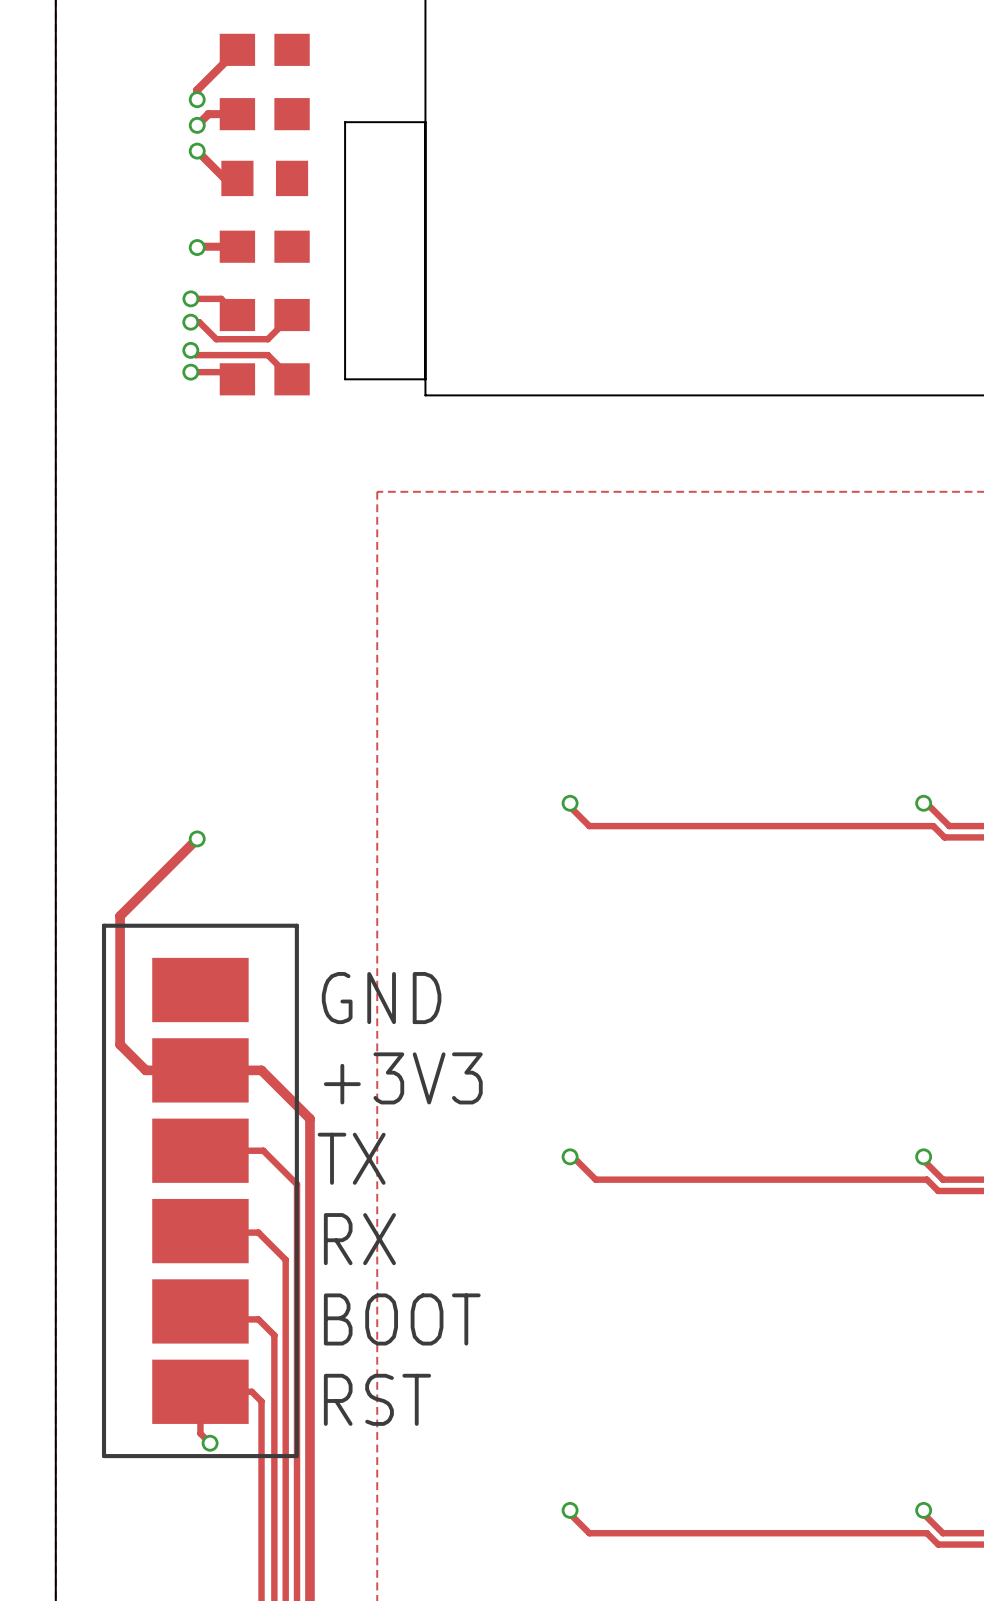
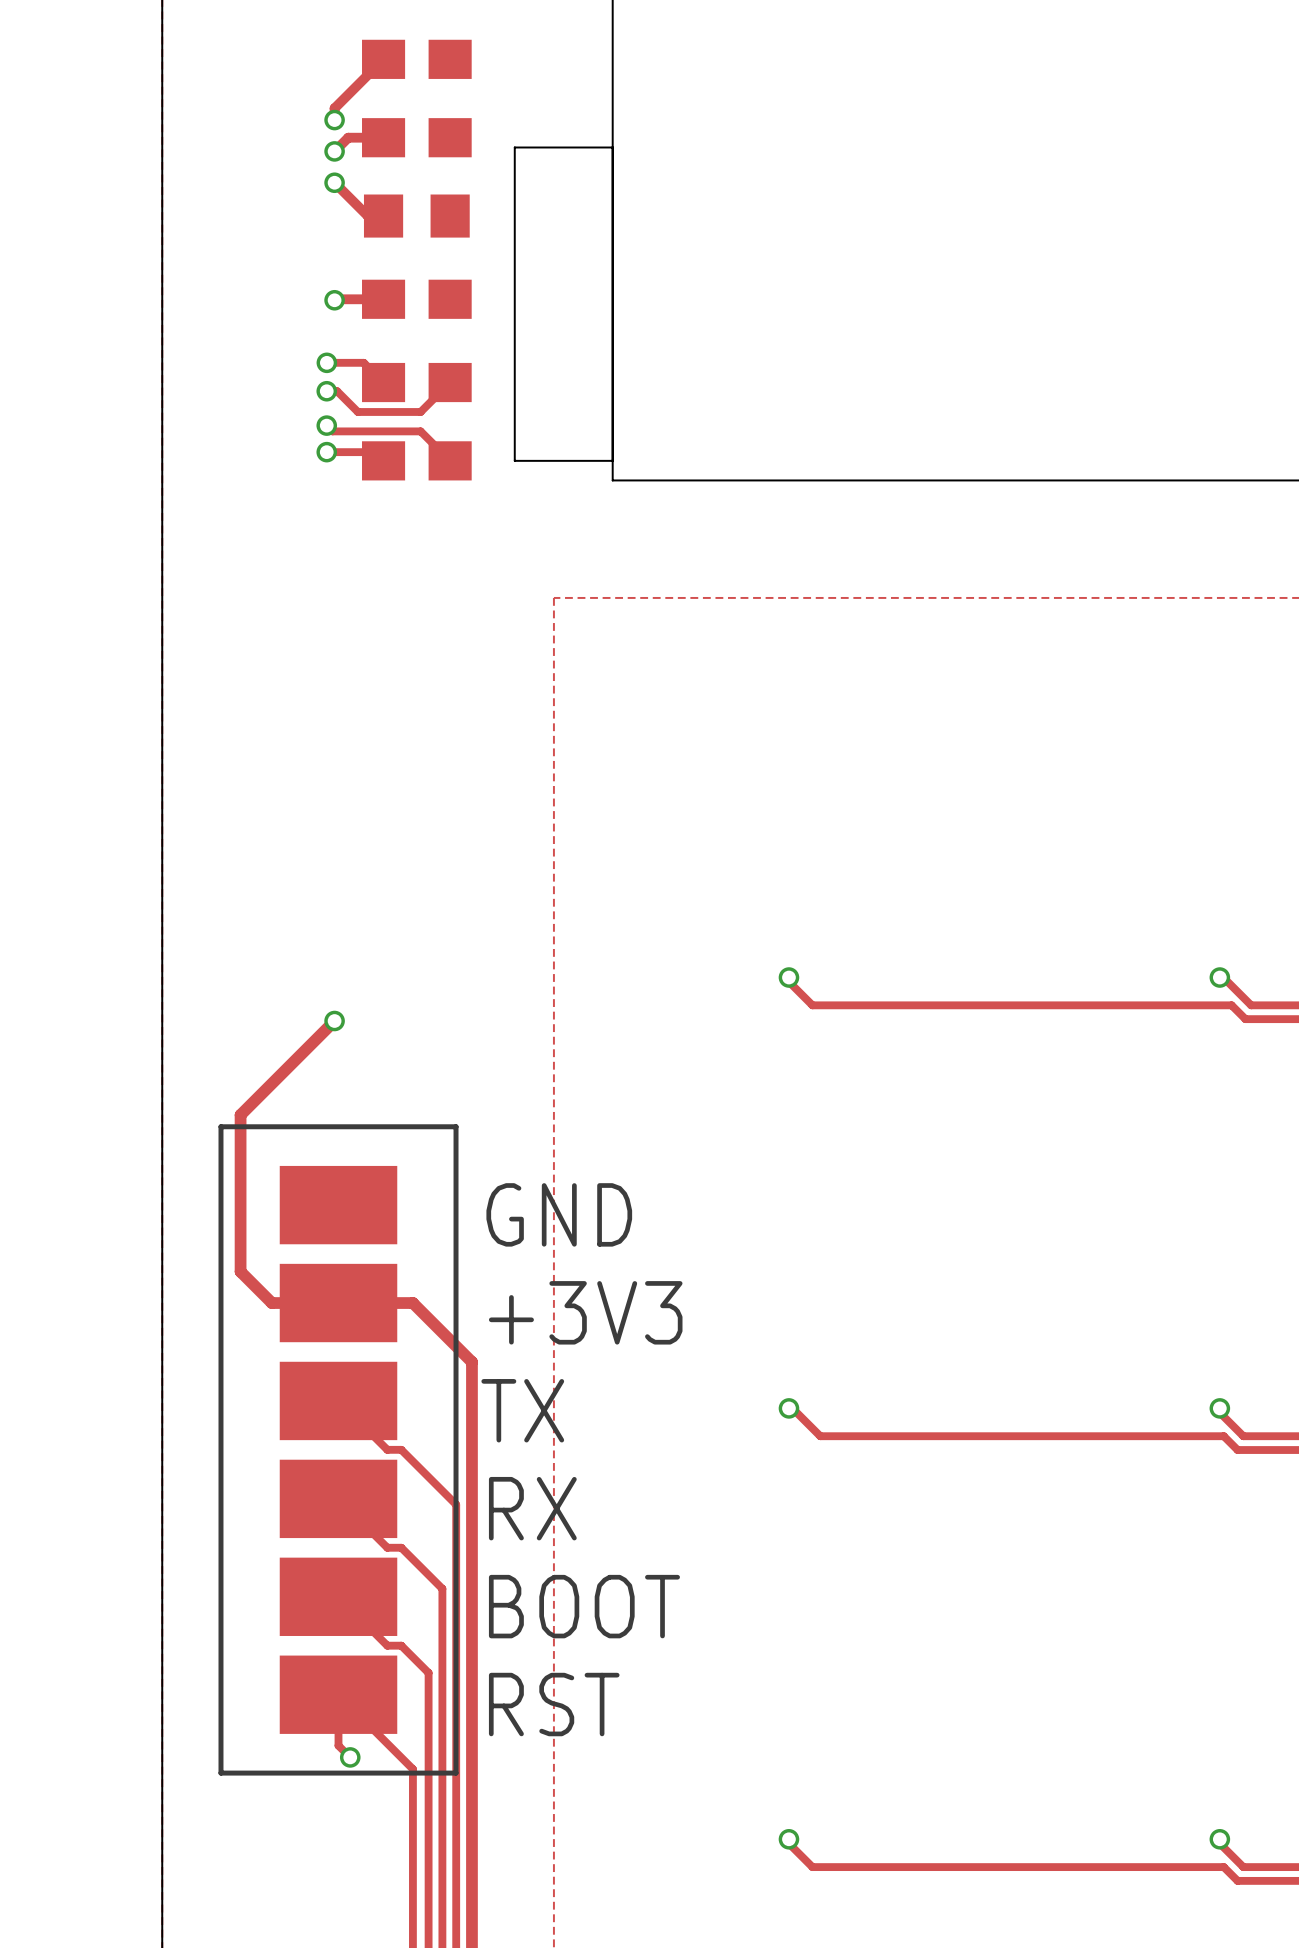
track: (200, 1150) (263, 1150) (297, 1184) (297, 1235) -> (338, 1400) (387, 1449) (401, 1449) (456, 1504)
track: (201, 1232) (258, 1232) (285, 1259) (285, 1304) -> (340, 1500) (387, 1547) (401, 1547) (442, 1588)
track: (208, 1319) (258, 1319) (274, 1335) (274, 1373) -> (348, 1606) (387, 1645) (401, 1645) (428, 1672)
track: (200, 1391) (251, 1391) (261, 1401) (261, 1452) -> (338, 1694) (412, 1769)

